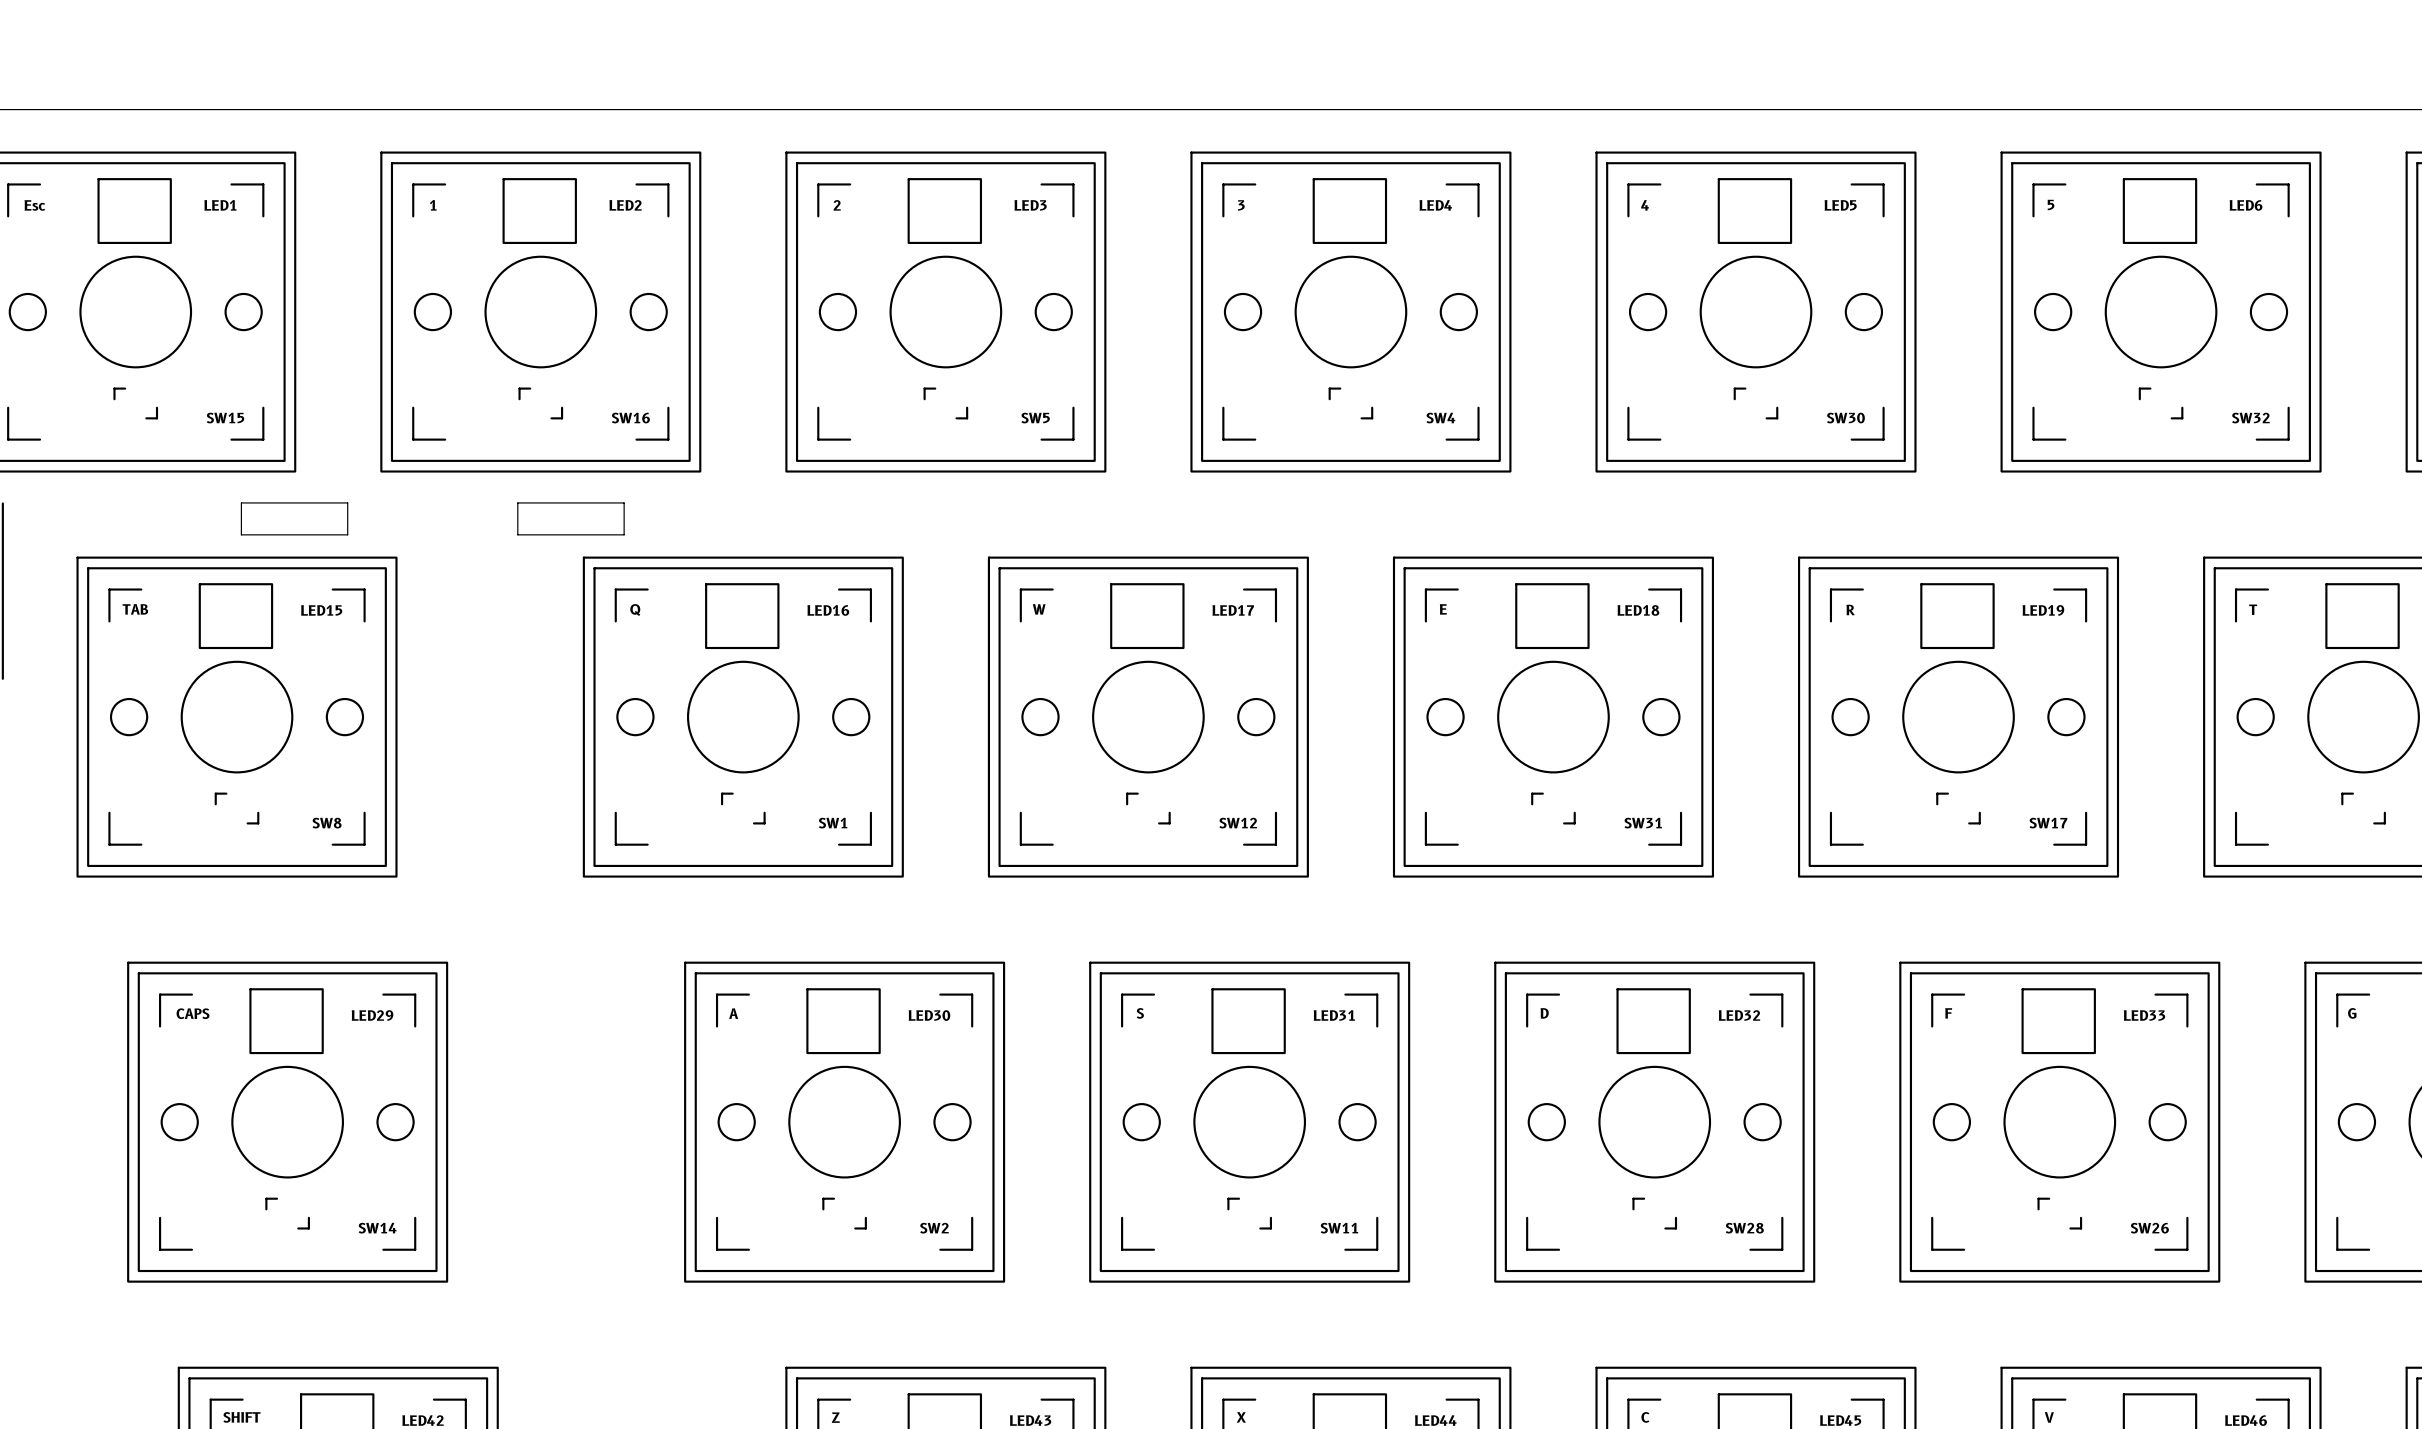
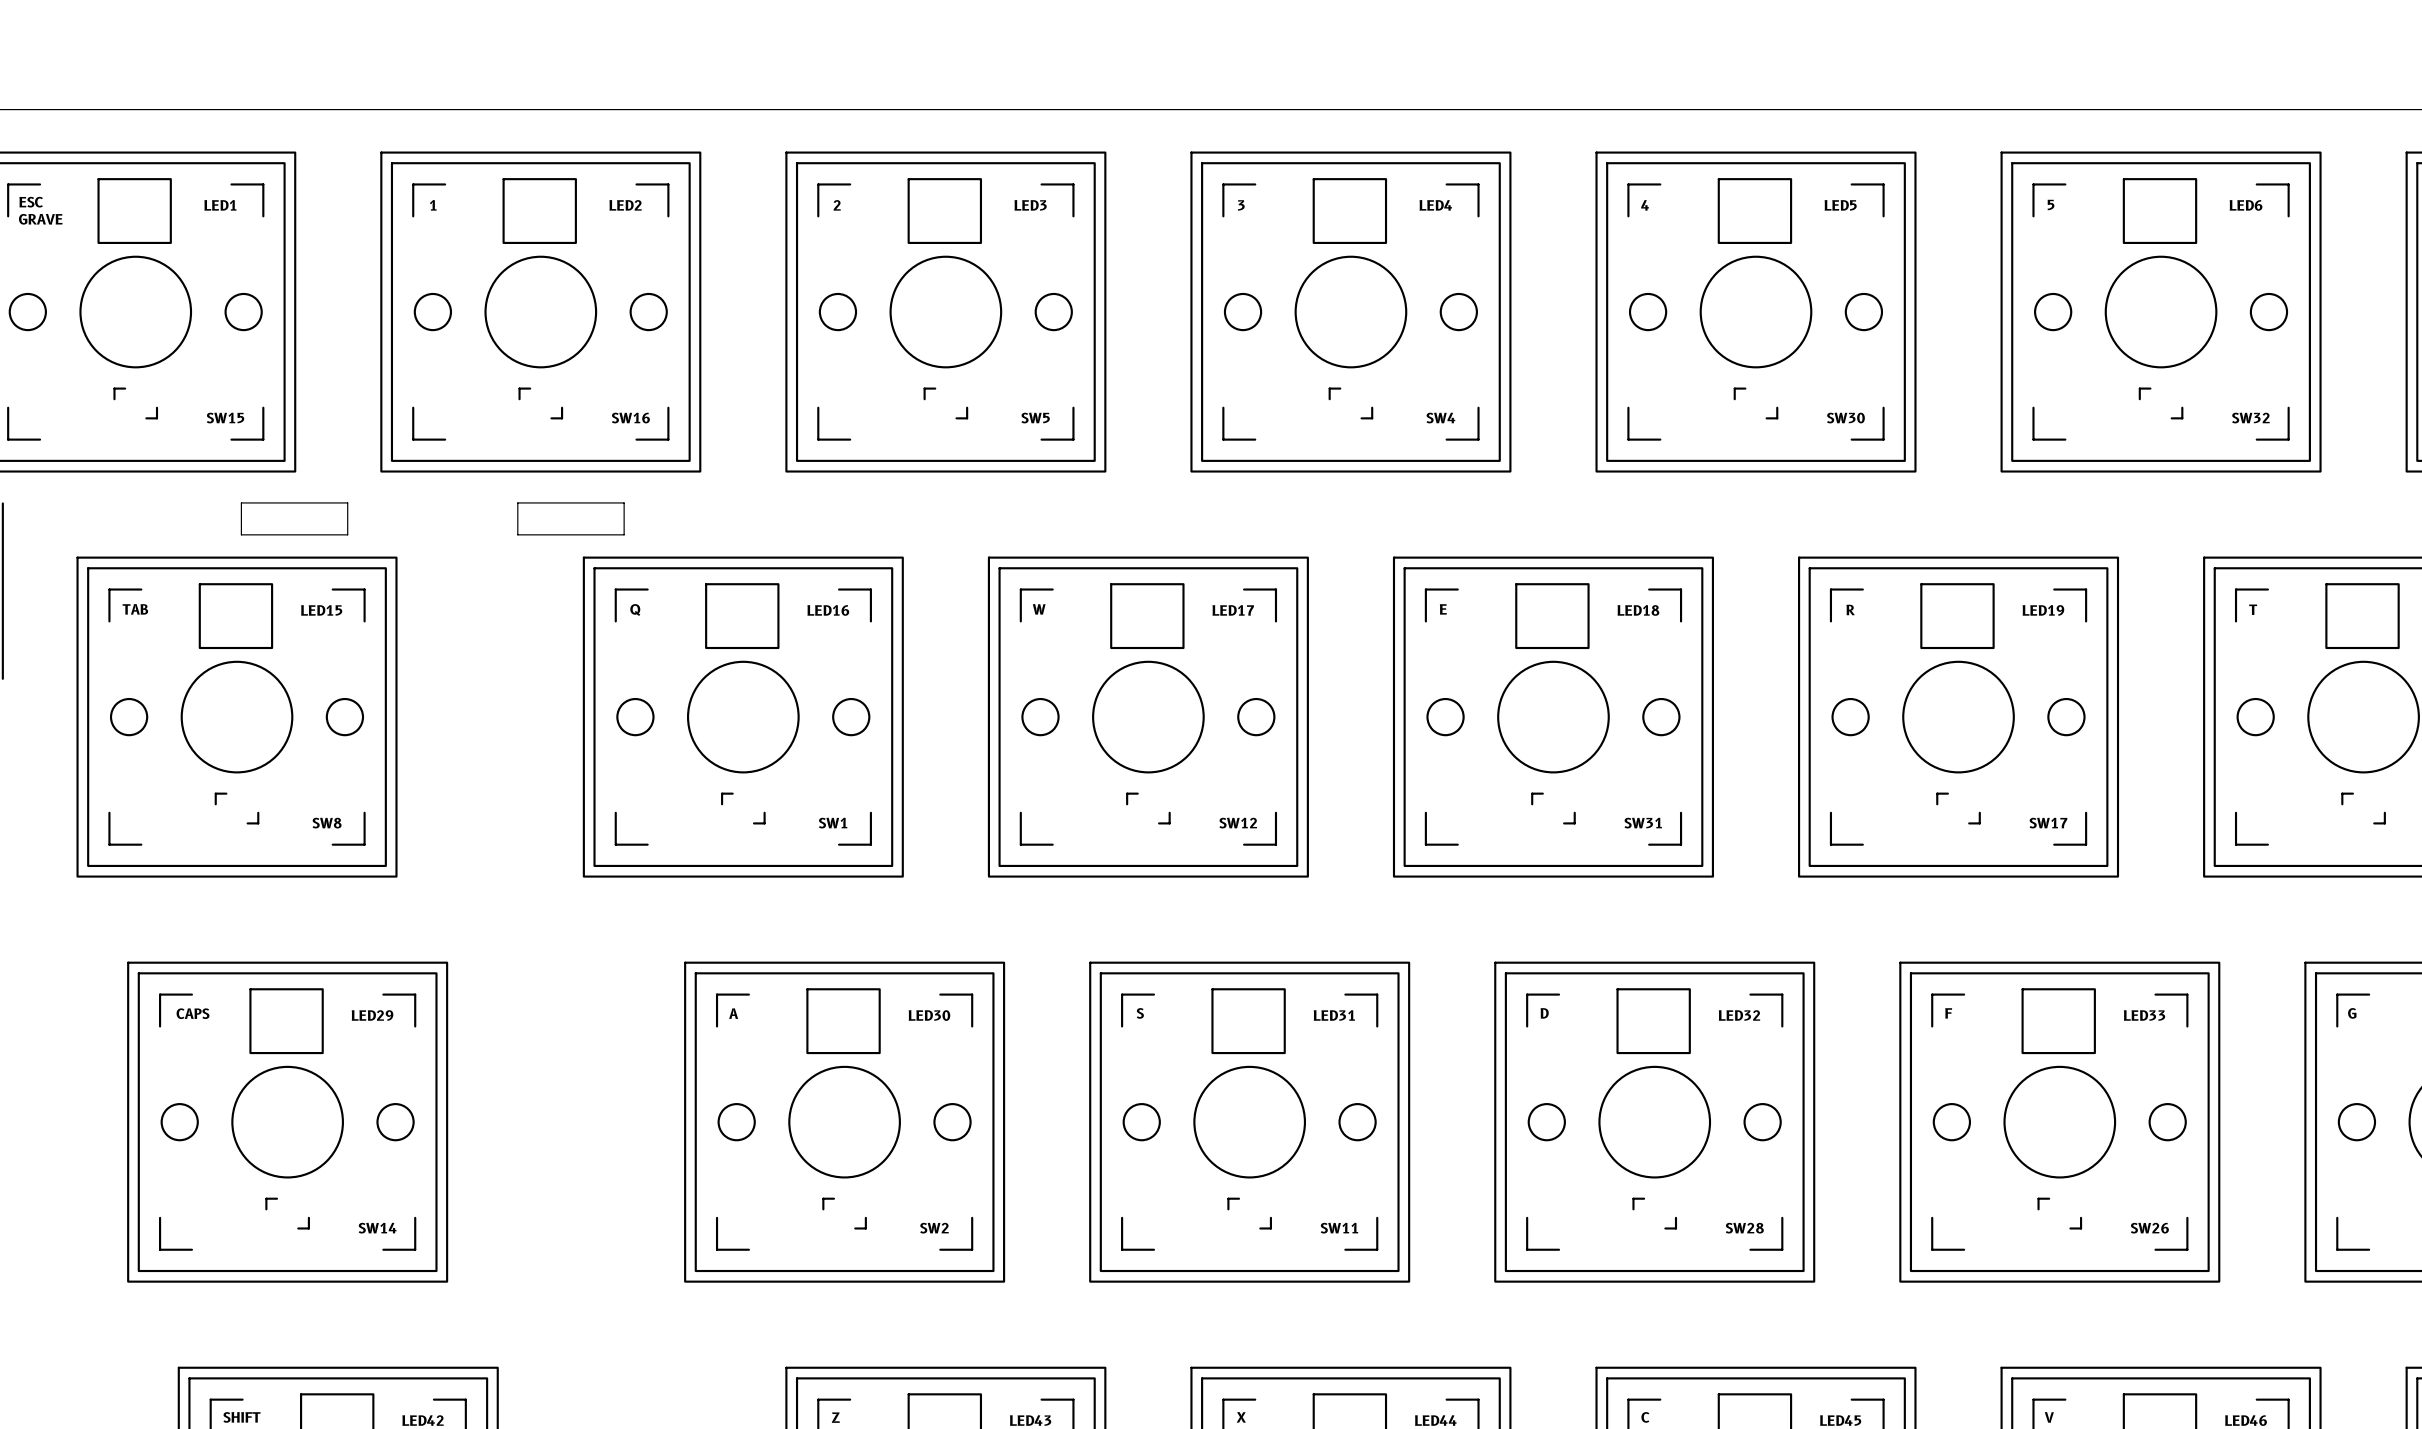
text: none -> ESC (31, 202)
text: Esc (34, 205) -> none
text: none -> GRAVE (40, 219)

